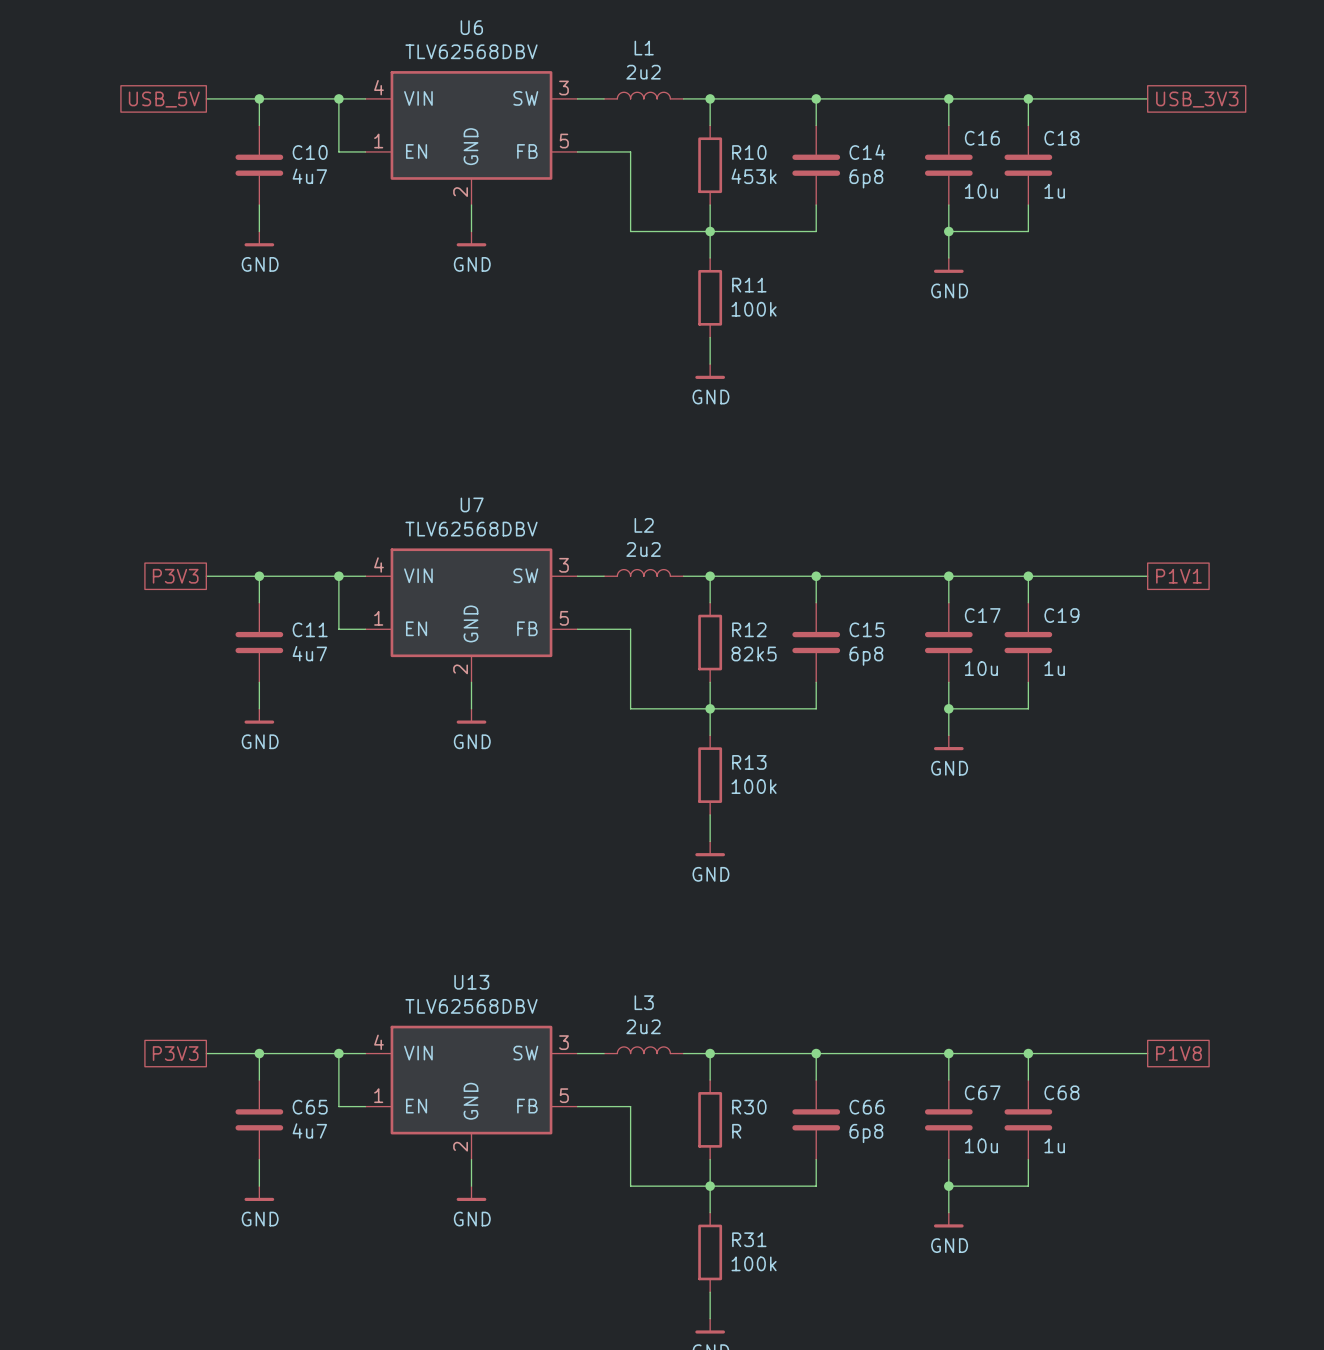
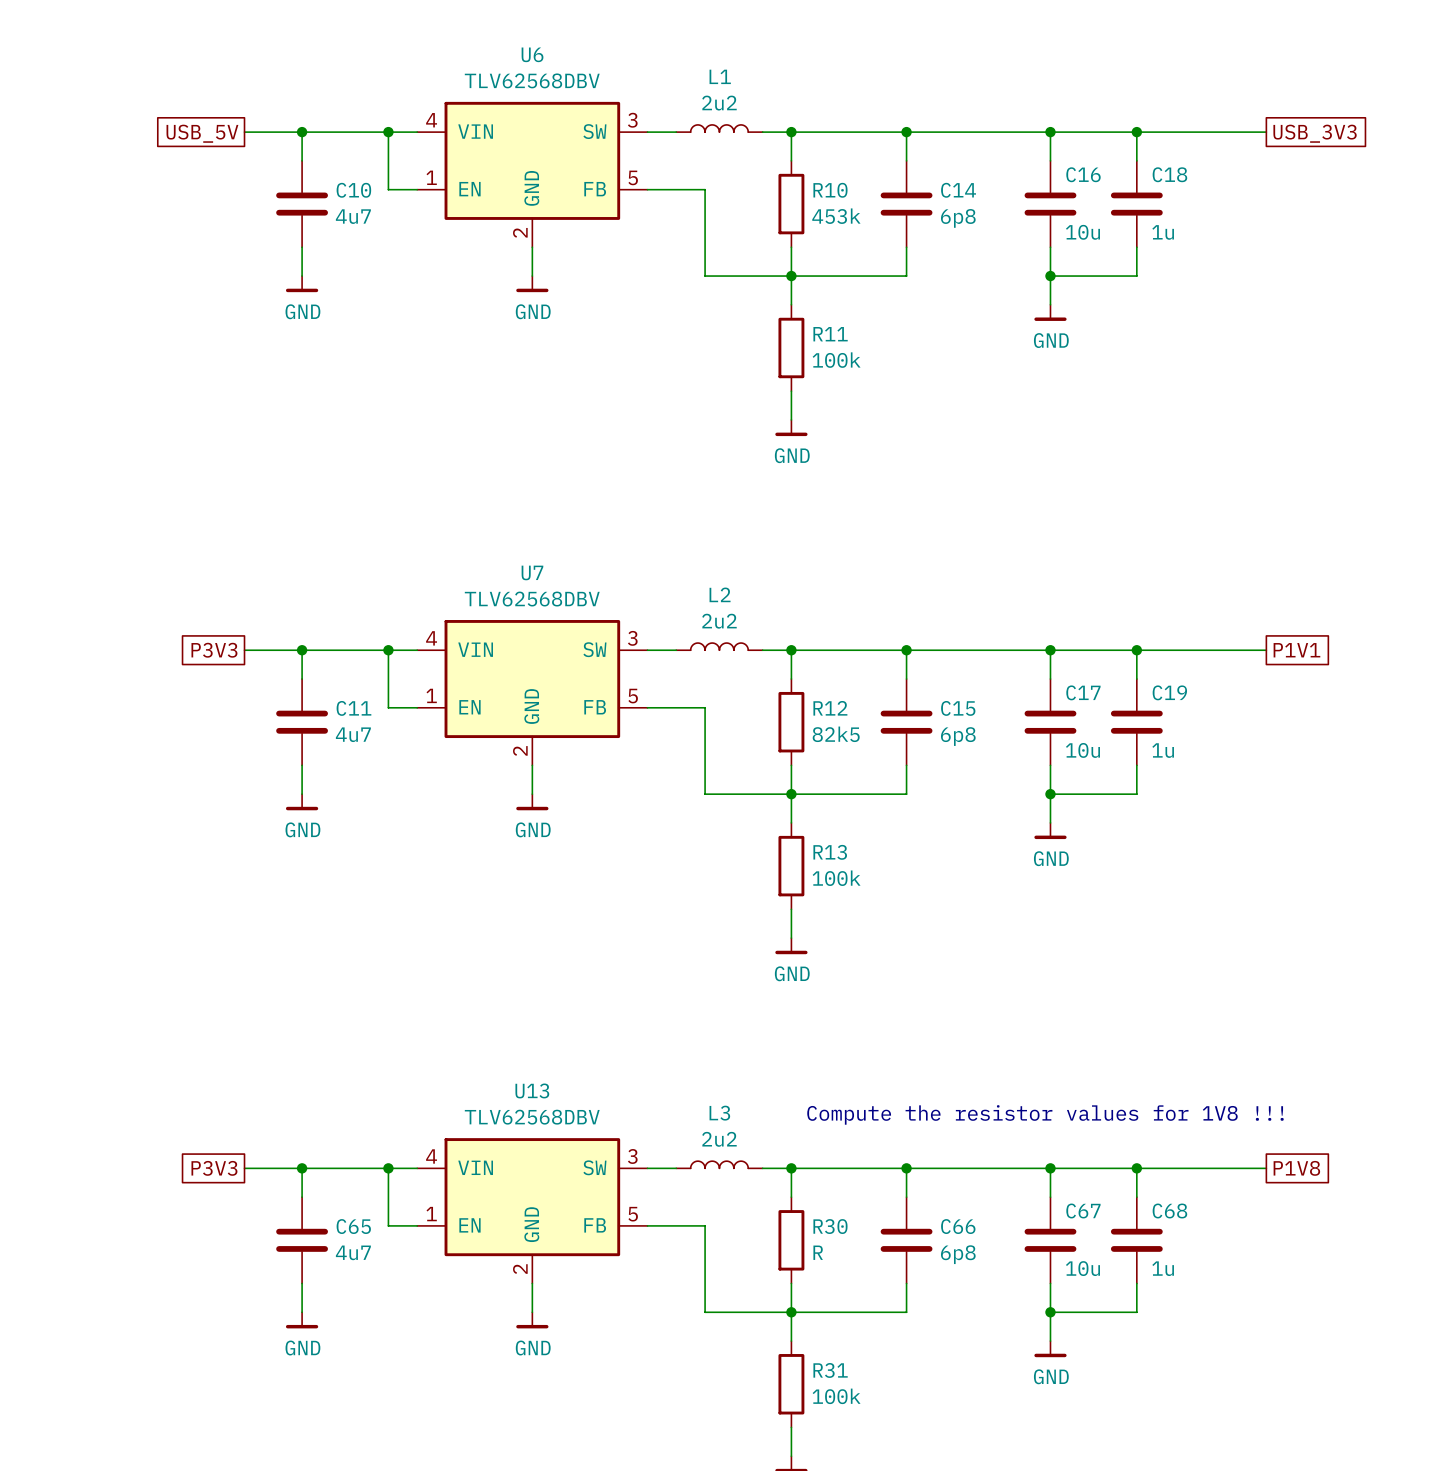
text: none -> Compute the resistor values for 1V8 !!! (1045, 1114)

